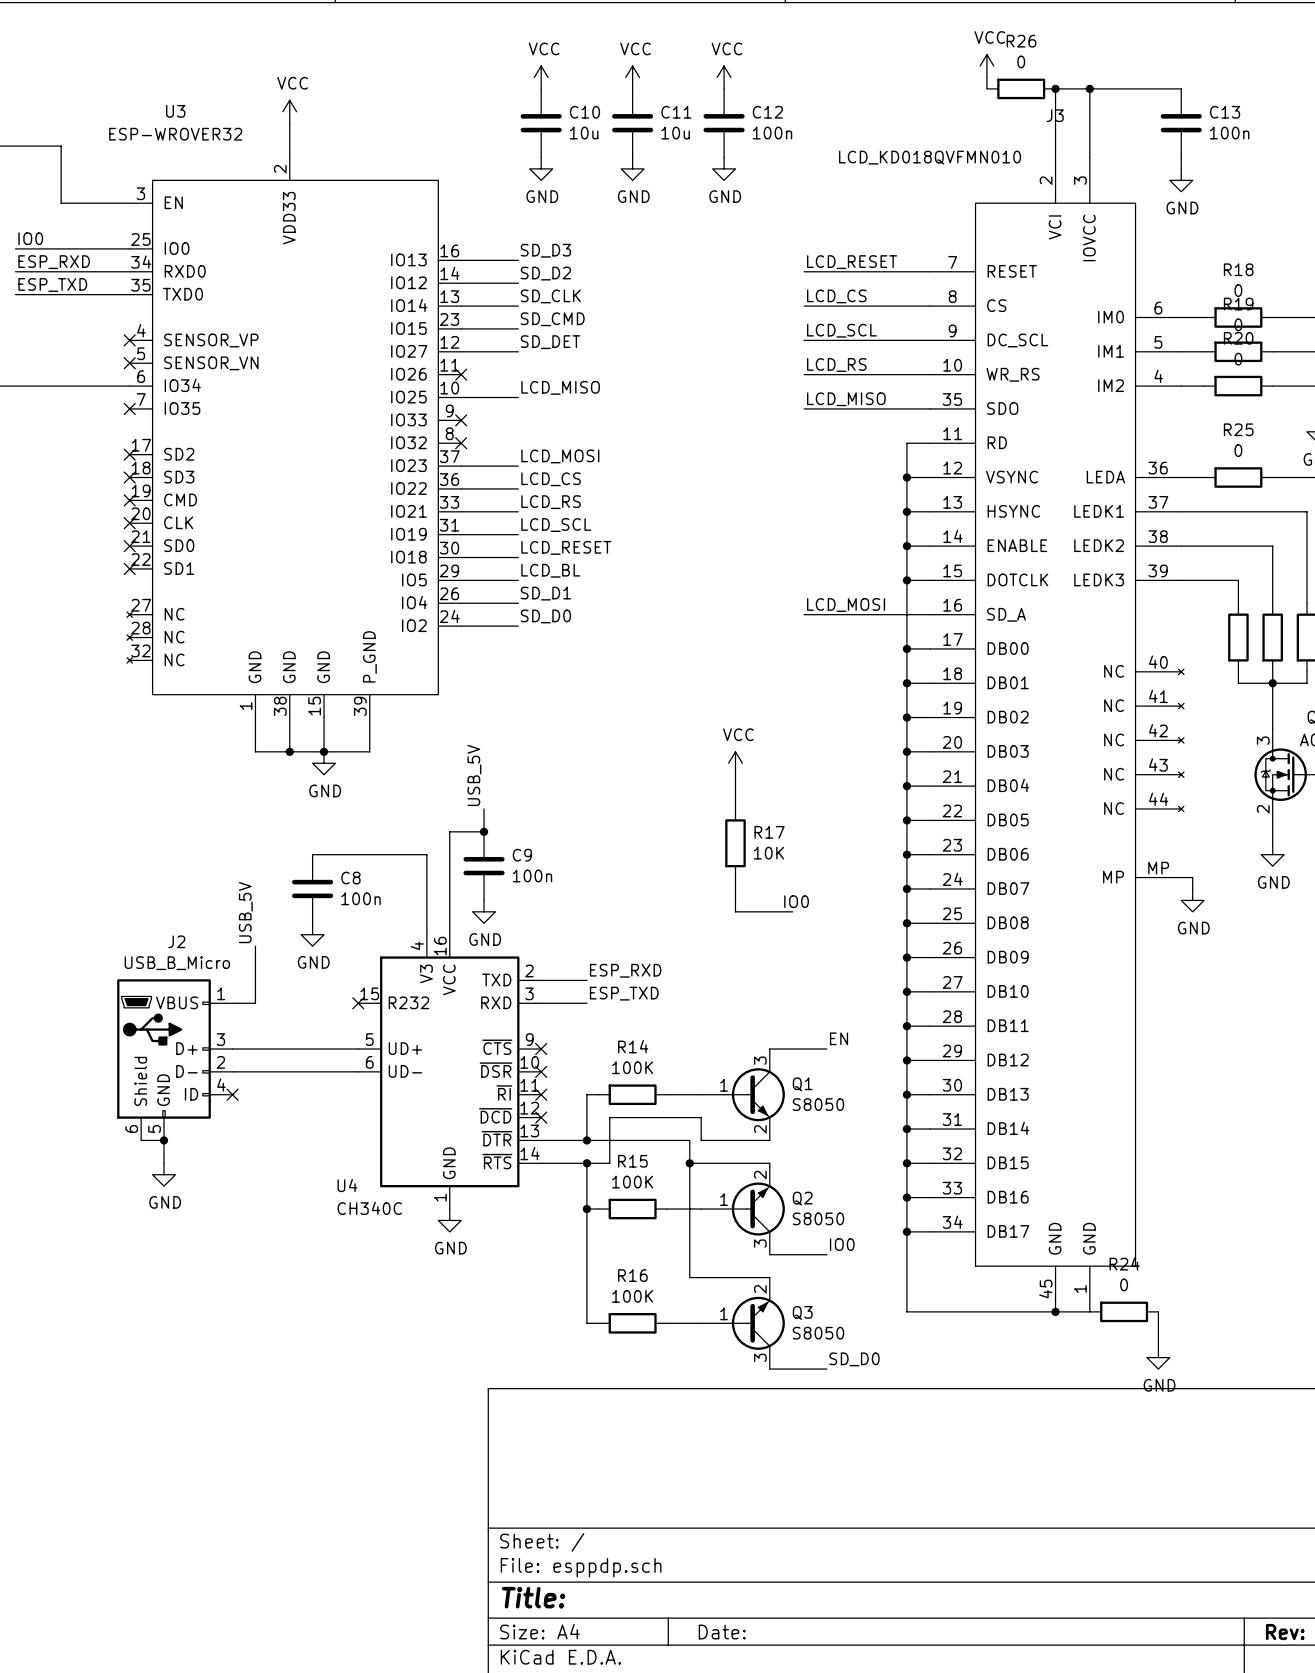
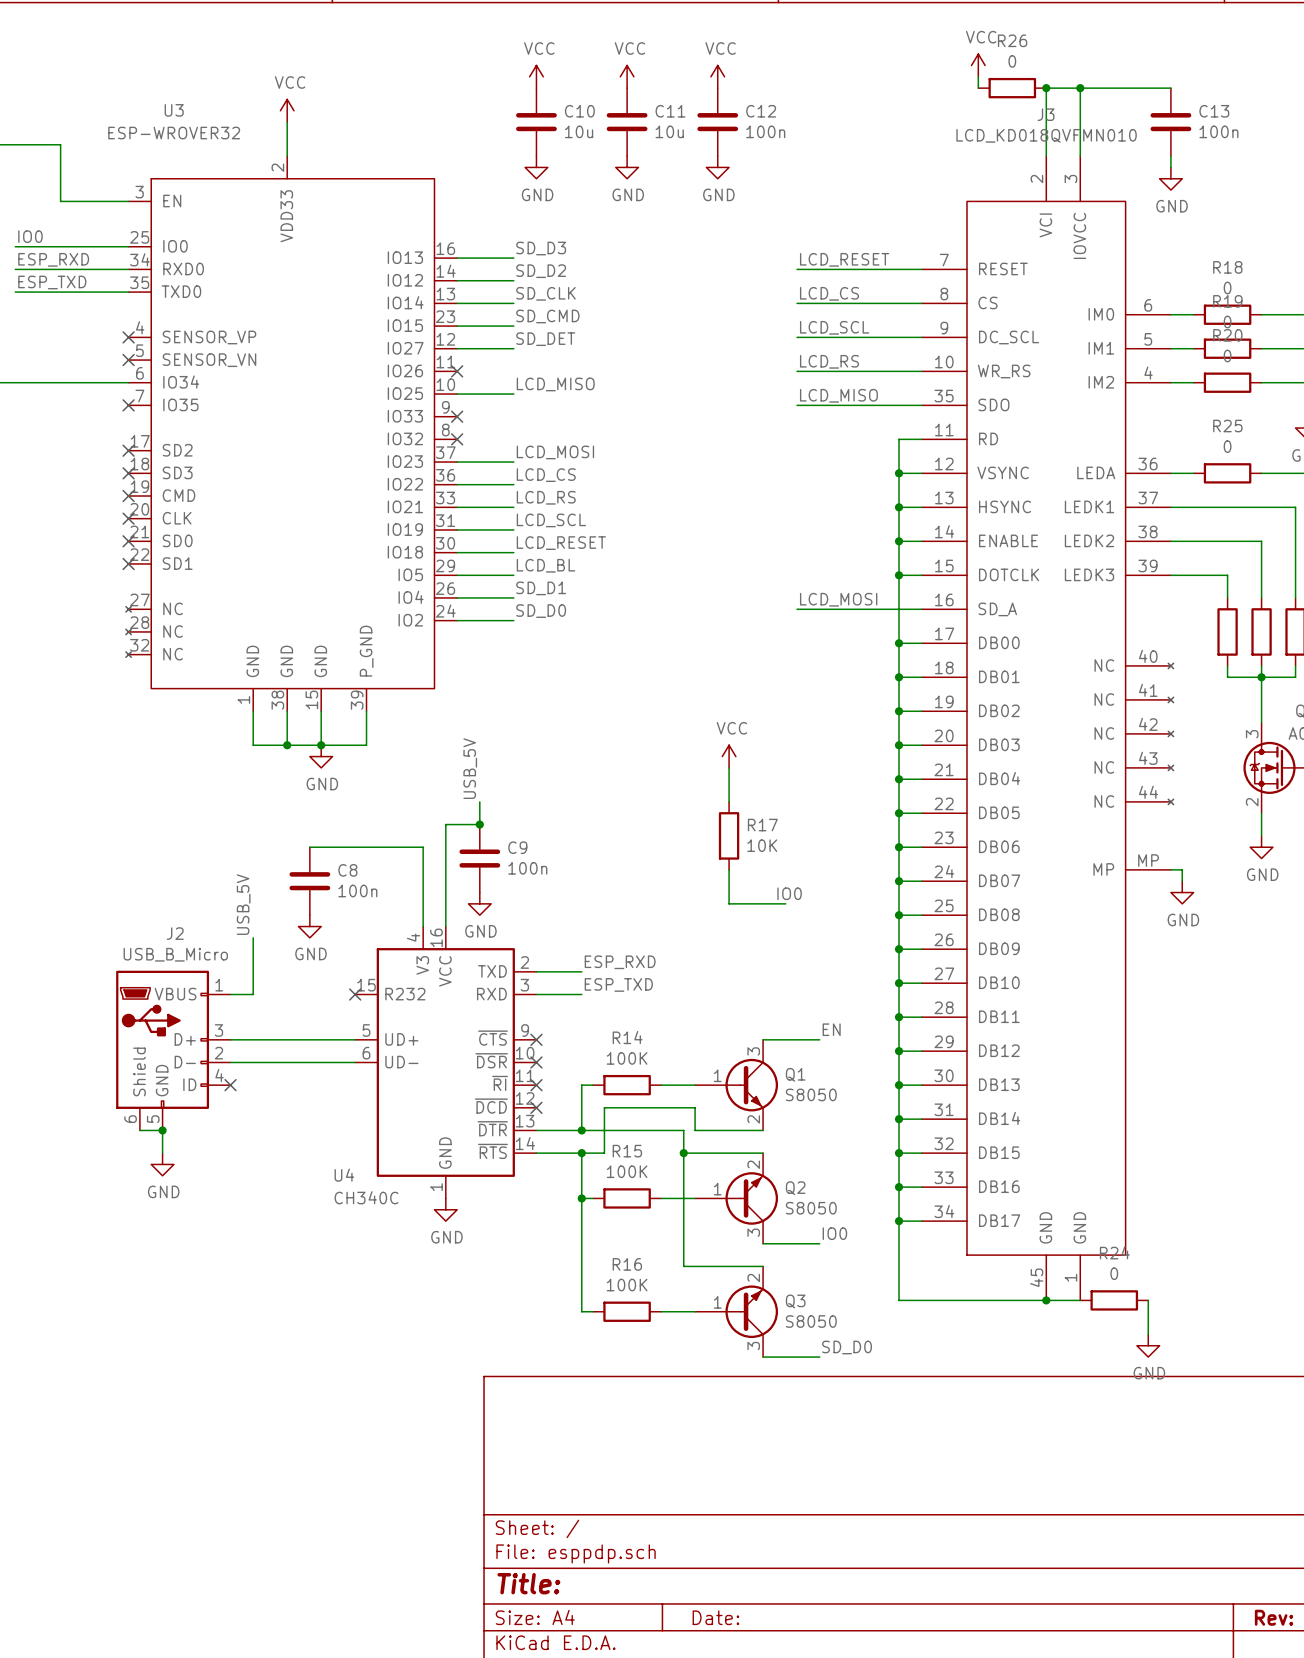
J3 value position: LCD_KD018QVFMN010 (930, 157) -> LCD_KD018QVFMN010 (1046, 135)

